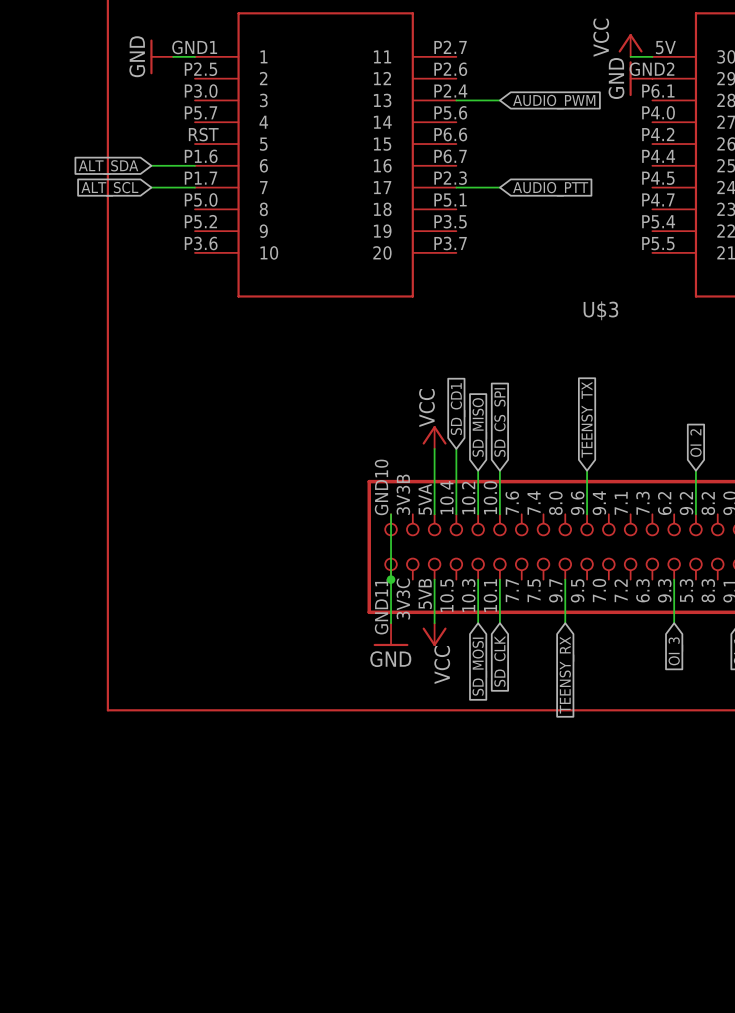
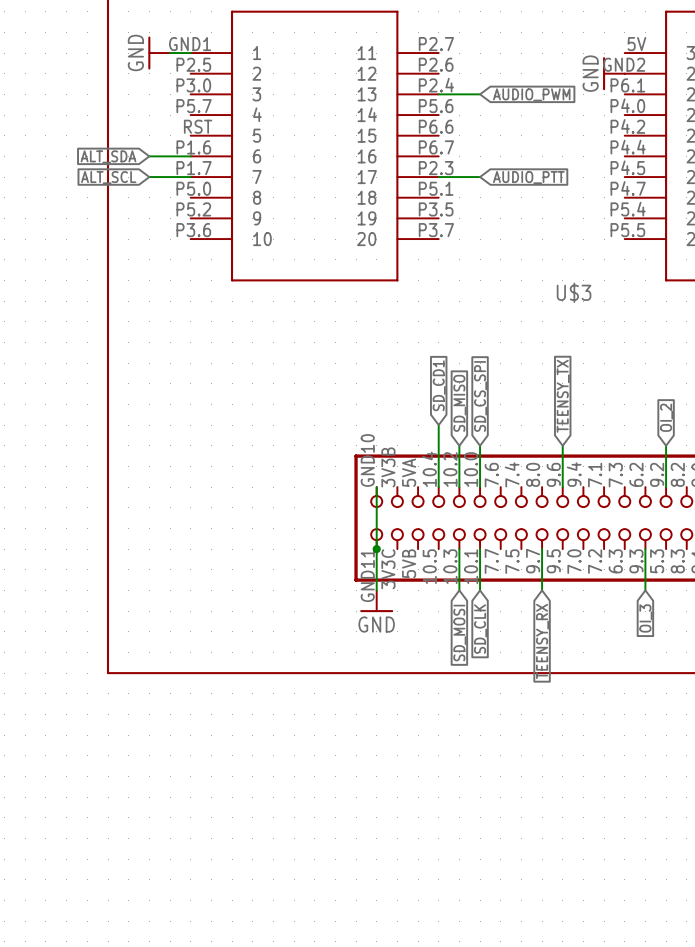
power symbol: VCC (630, 45) -> none
wire: (630, 56) (652, 56) -> none
power symbol: VCC (434, 437) -> none
wire: (434, 448) (434, 514) -> none
wire: (434, 579) (434, 623) -> none
power symbol: VCC (434, 634) -> none

